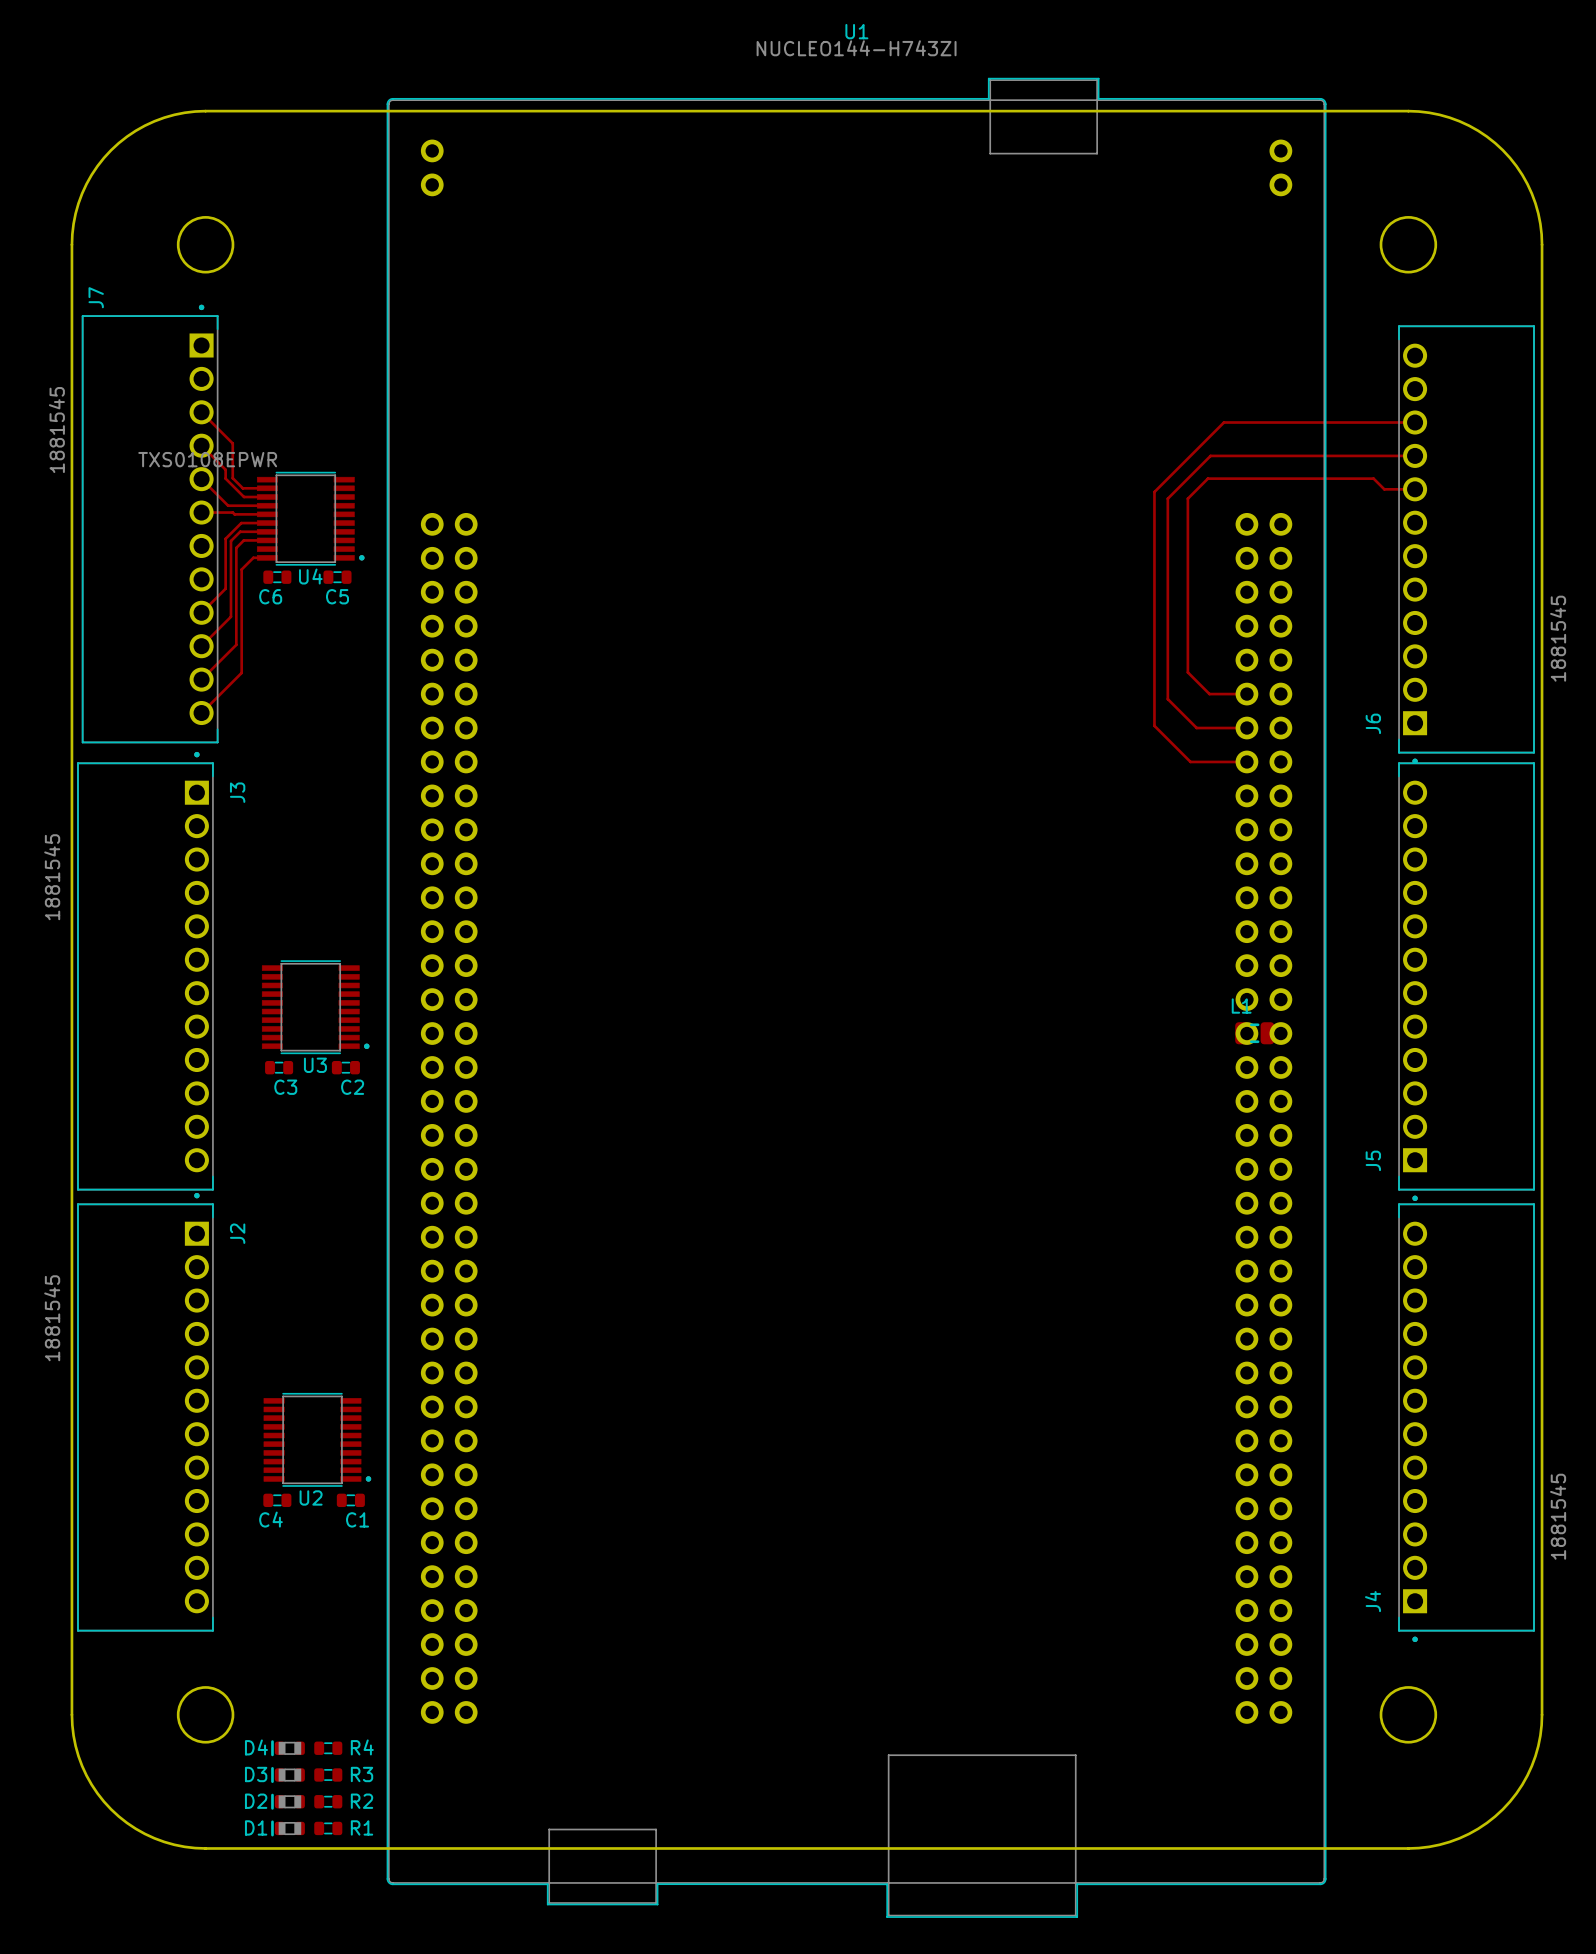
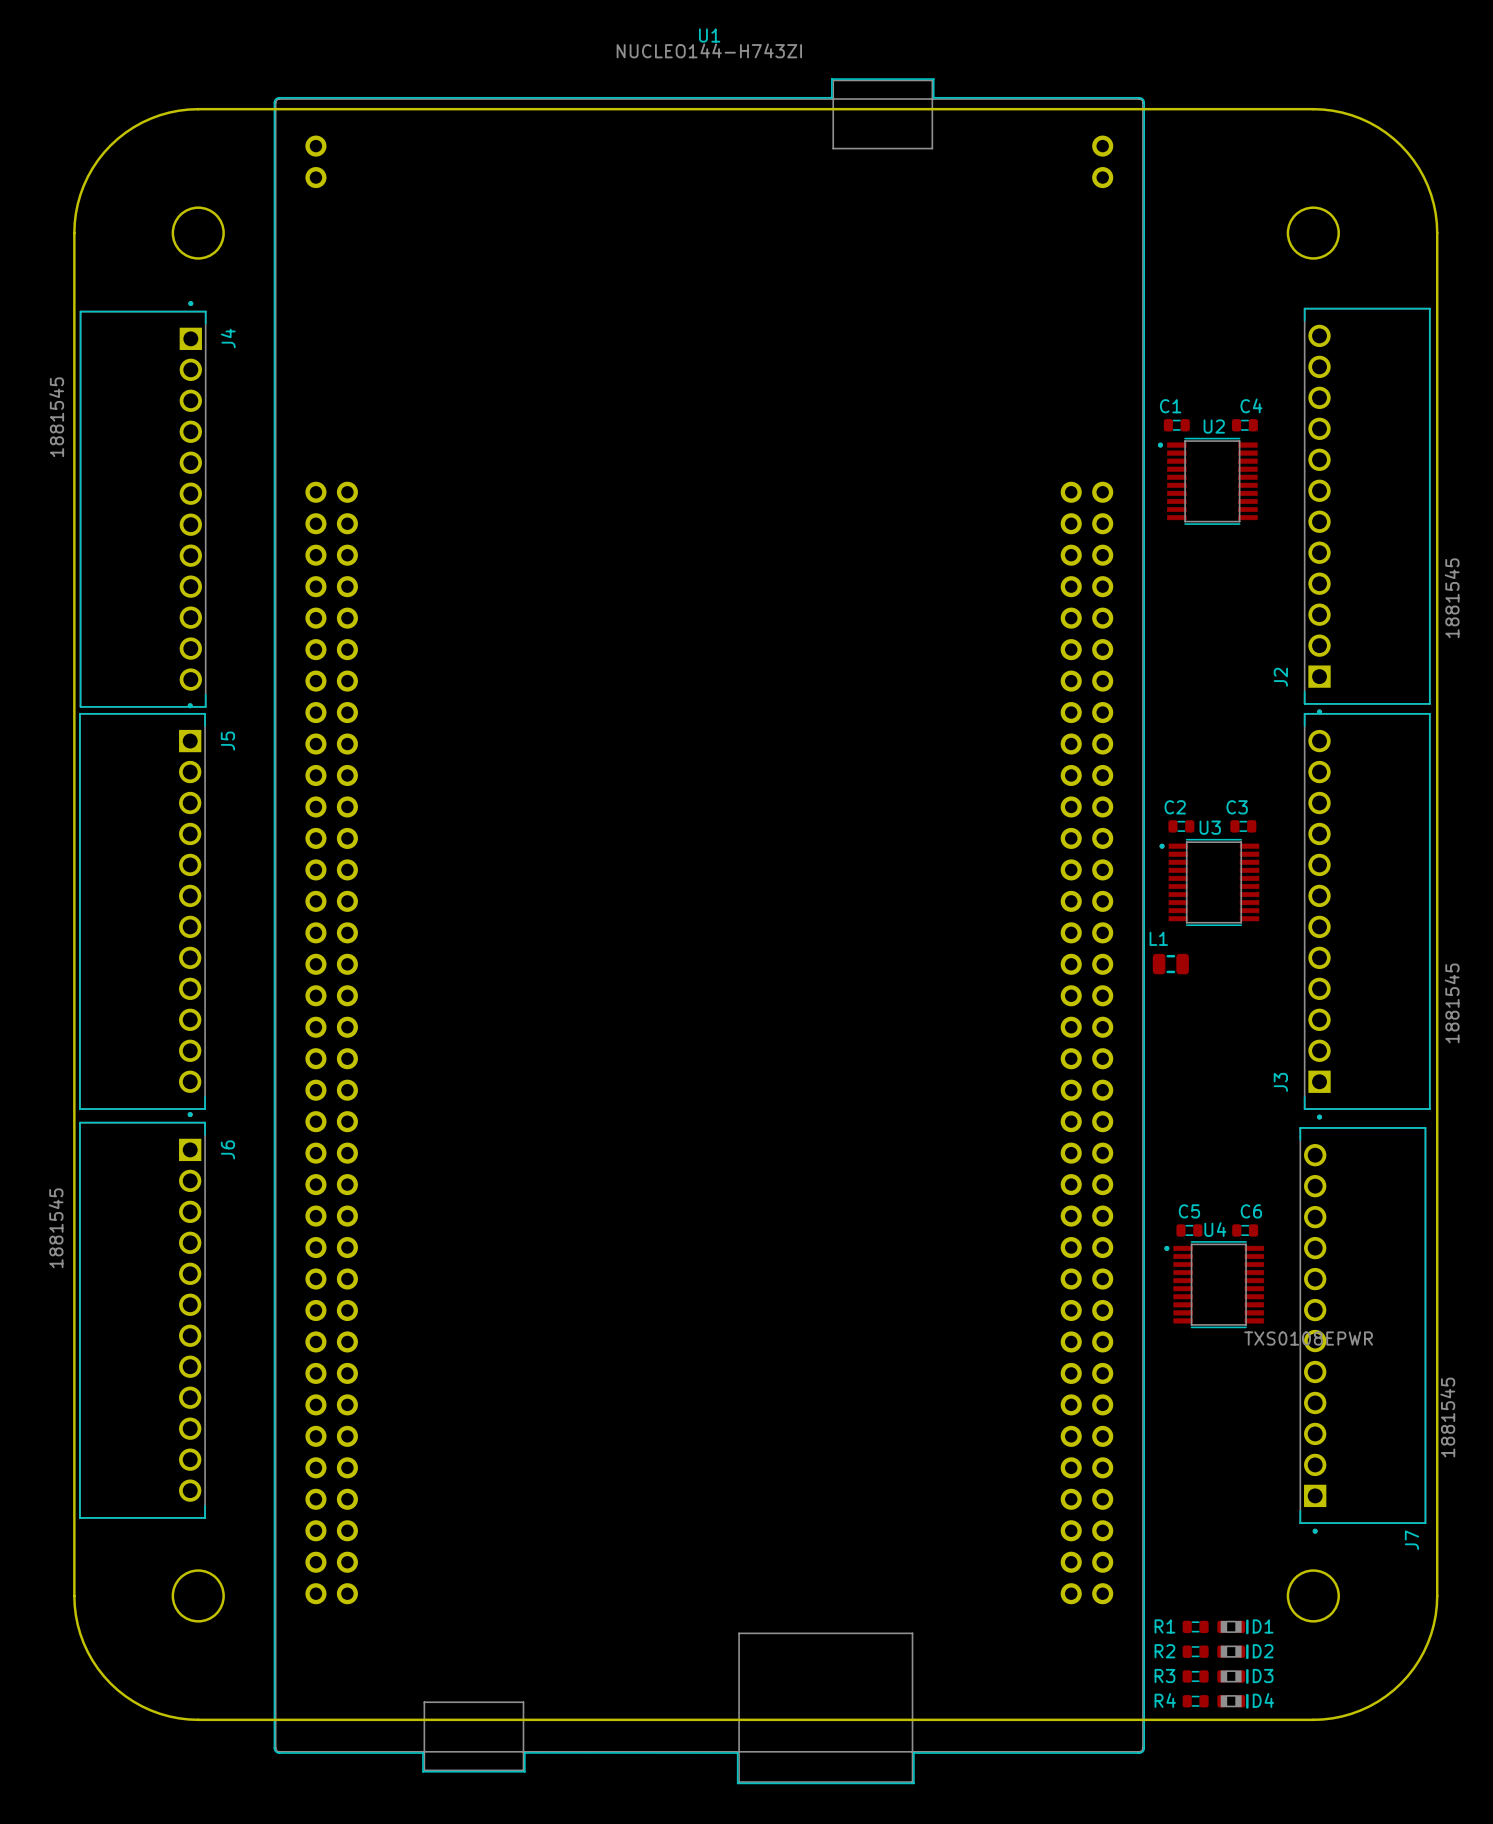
track: (201, 412) (232, 443) (232, 478) (242, 488) (267, 488) -> none
track: (1415, 422) (1223, 422) (1154, 492) (1154, 725) (1190, 761) (1246, 761) -> none
track: (201, 445) (225, 469) (225, 478) (244, 497) (267, 497) -> none
track: (1415, 455) (1210, 455) (1167, 498) (1167, 699) (1196, 728) (1246, 728) -> none
track: (201, 479) (228, 505) (267, 505) -> none
track: (1415, 489) (1384, 489) (1373, 478) (1207, 478) (1187, 498) (1187, 672) (1209, 694) (1246, 694) -> none
track: (201, 512) (267, 514) -> none
U4 rotation: 0° (310, 518) -> 180° (1214, 1284)
U4 position: (310, 518) -> (1214, 1284)
track: (267, 523) (241, 523) (225, 538) (225, 588) (201, 612) -> none
J7 rotation: 0° (150, 524) -> 180° (1362, 1330)
J7 position: (150, 524) -> (1362, 1330)
track: (267, 531) (240, 531) (230, 540) (230, 616) (201, 646) -> none
track: (267, 540) (243, 540) (236, 547) (236, 644) (201, 679) -> none
track: (267, 557) (253, 557) (241, 569) (241, 672) (201, 713) -> none
C6 position: (277, 577) -> (1245, 1230)
C5 position: (337, 577) -> (1189, 1230)
C6 name position: C6 (270, 596) -> C6 (1251, 1211)
C5 name position: C5 (337, 596) -> C5 (1189, 1211)
J6 name: J6 (1373, 723) -> J2 (1280, 677)
J3 name: J3 (237, 792) -> J5 (227, 741)
J3 value: 1881545 (52, 877) -> none
U1 position: (856, 997) -> (709, 931)
U3 rotation: 0° (315, 1007) -> 180° (1209, 882)
U3 position: (315, 1007) -> (1209, 882)
C3 position: (279, 1067) -> (1243, 826)
C2 position: (345, 1067) -> (1181, 826)
J5 value: none -> 1881545 (1452, 1003)
C3 name position: C3 (285, 1087) -> C3 (1237, 807)
C2 name position: C2 (352, 1087) -> C2 (1175, 807)
J5 name: J5 (1373, 1160) -> J3 (1280, 1082)
J2 name: J2 (237, 1233) -> J6 (227, 1149)
J4 rotation: 0° (1466, 1422) -> 180° (143, 504)
J4 position: (1466, 1422) -> (143, 504)
U2 rotation: 0° (317, 1439) -> 180° (1207, 481)
U2 position: (317, 1439) -> (1207, 481)
C4 position: (277, 1500) -> (1244, 425)
C1 position: (350, 1500) -> (1176, 425)
C4 name position: C4 (270, 1519) -> C4 (1251, 405)
C1 name position: C1 (357, 1519) -> C1 (1170, 406)
R4 name position: R4 (362, 1747) -> R4 (1165, 1700)
D4 rotation: 0° (288, 1748) -> 180° (1232, 1701)
D4 position: (288, 1748) -> (1232, 1701)
R4 position: (328, 1748) -> (1195, 1701)
D3 rotation: 0° (288, 1774) -> 180° (1232, 1676)
D3 position: (288, 1774) -> (1232, 1676)
R3 position: (328, 1774) -> (1195, 1676)
R3 name position: R3 (362, 1774) -> R3 (1164, 1676)
D2 rotation: 0° (288, 1801) -> 180° (1232, 1651)
D2 position: (288, 1801) -> (1232, 1651)
R2 position: (328, 1801) -> (1195, 1651)
R2 name position: R2 (362, 1801) -> R2 (1164, 1651)
R1 name position: R1 (362, 1827) -> R1 (1164, 1626)
D1 rotation: 0° (288, 1828) -> 180° (1232, 1626)
D1 position: (288, 1828) -> (1232, 1626)
R1 position: (328, 1828) -> (1195, 1626)

